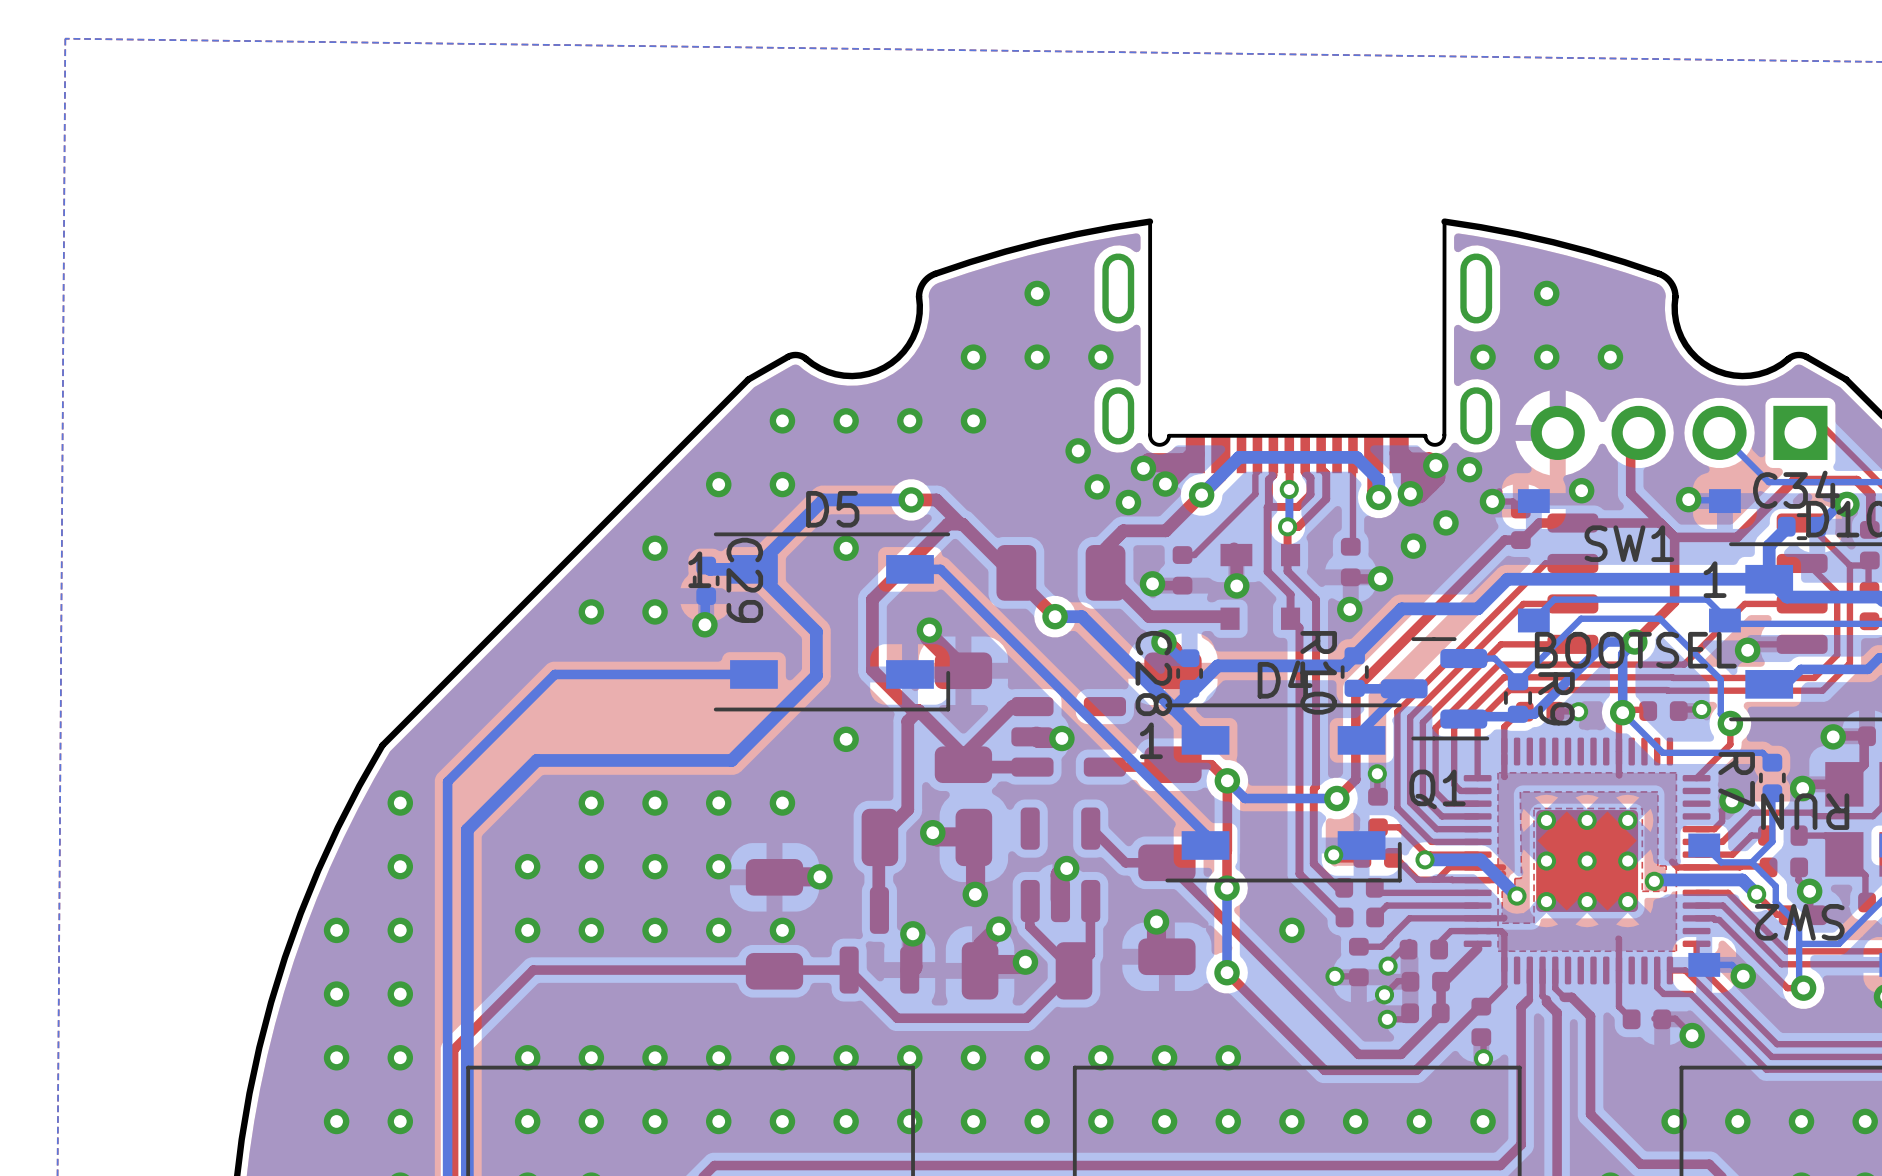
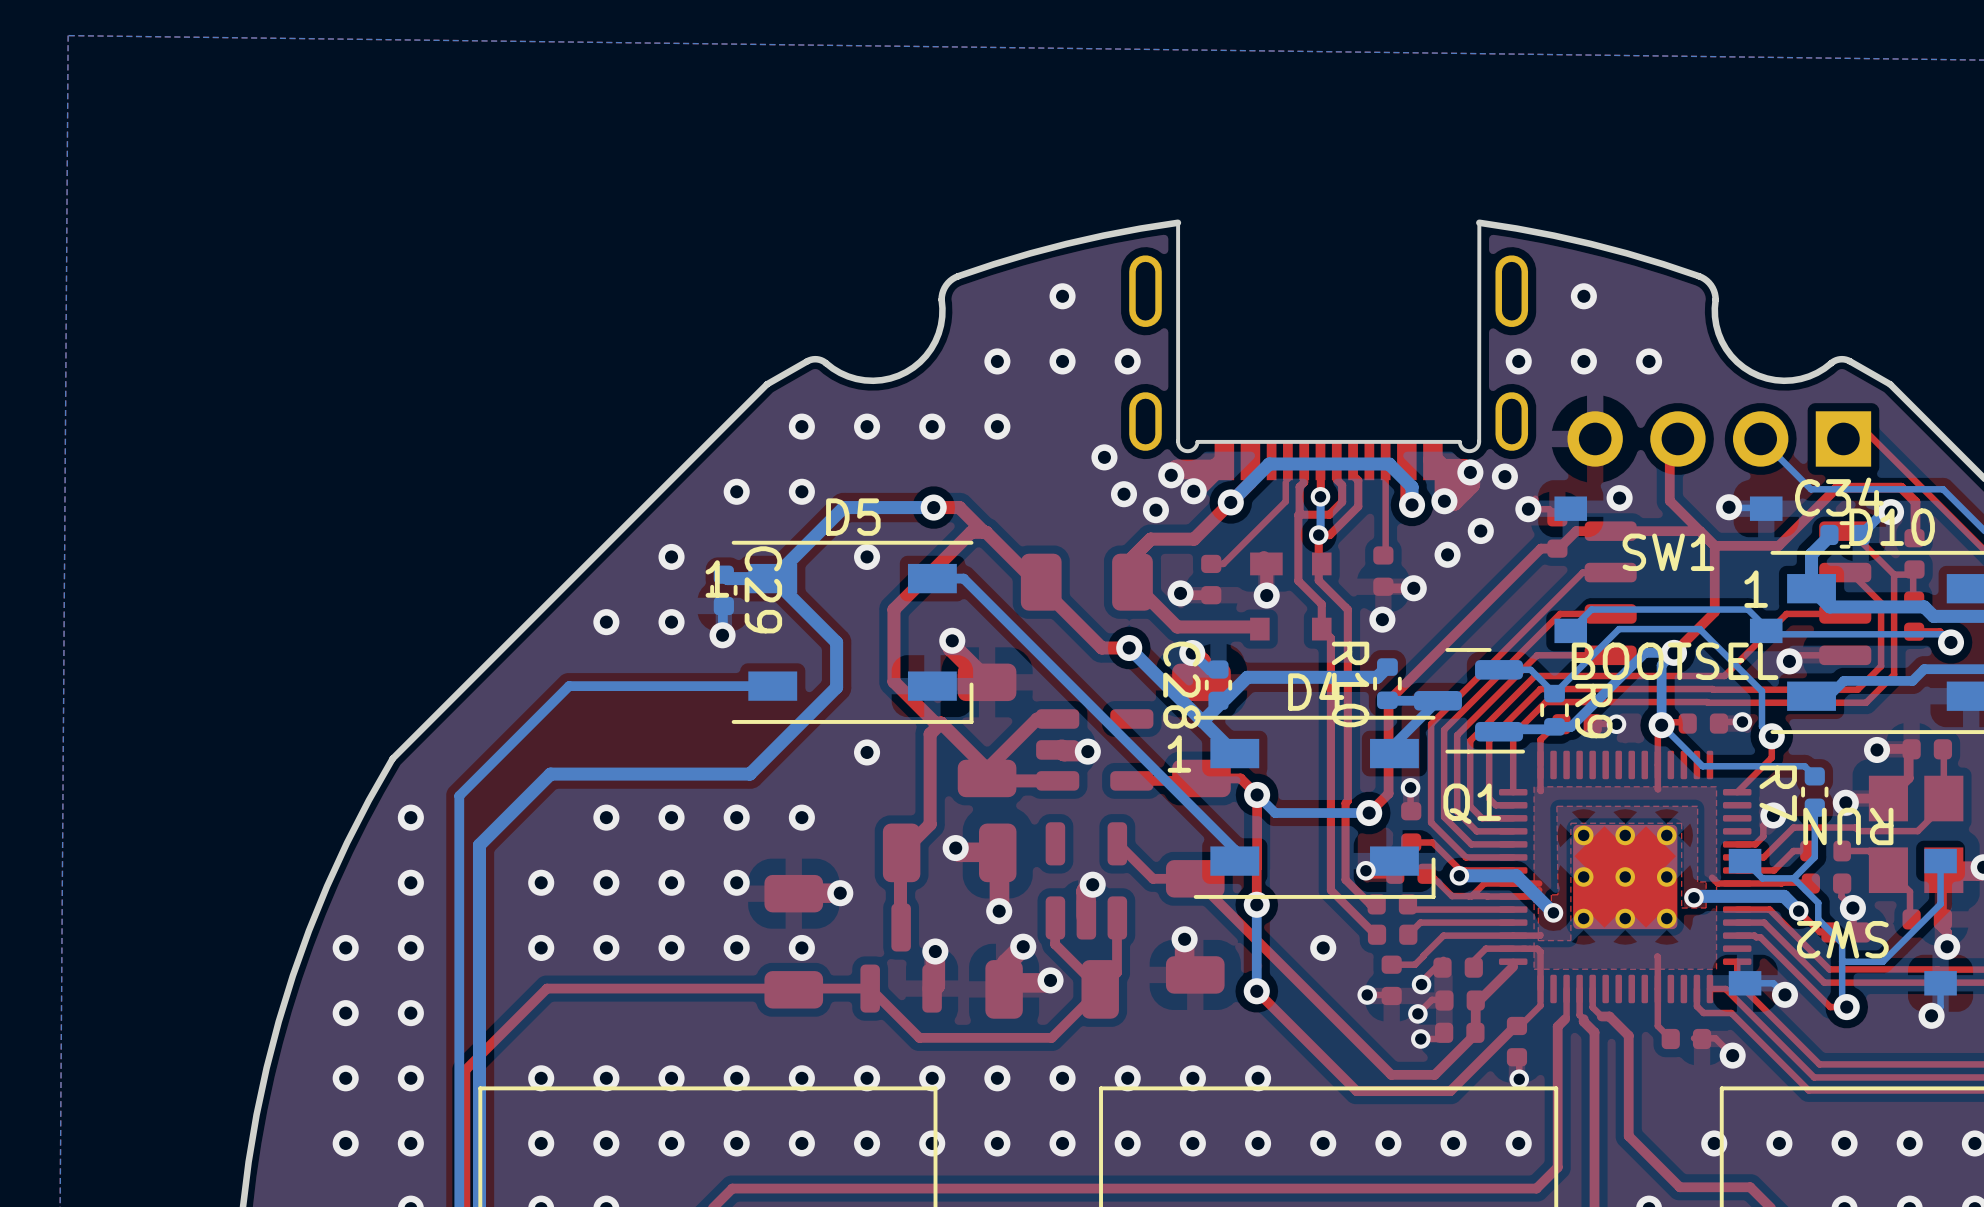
bottom track: (1769, 579) (1507, 579) (1477, 608) (1401, 608) (1354, 655) -> none
top track: none -> (1080, 626) (1101, 647) (1129, 647)
bottom track: (1055, 616) (1081, 616) (1102, 637) -> none
via position: (1055, 616) -> (1129, 647)

